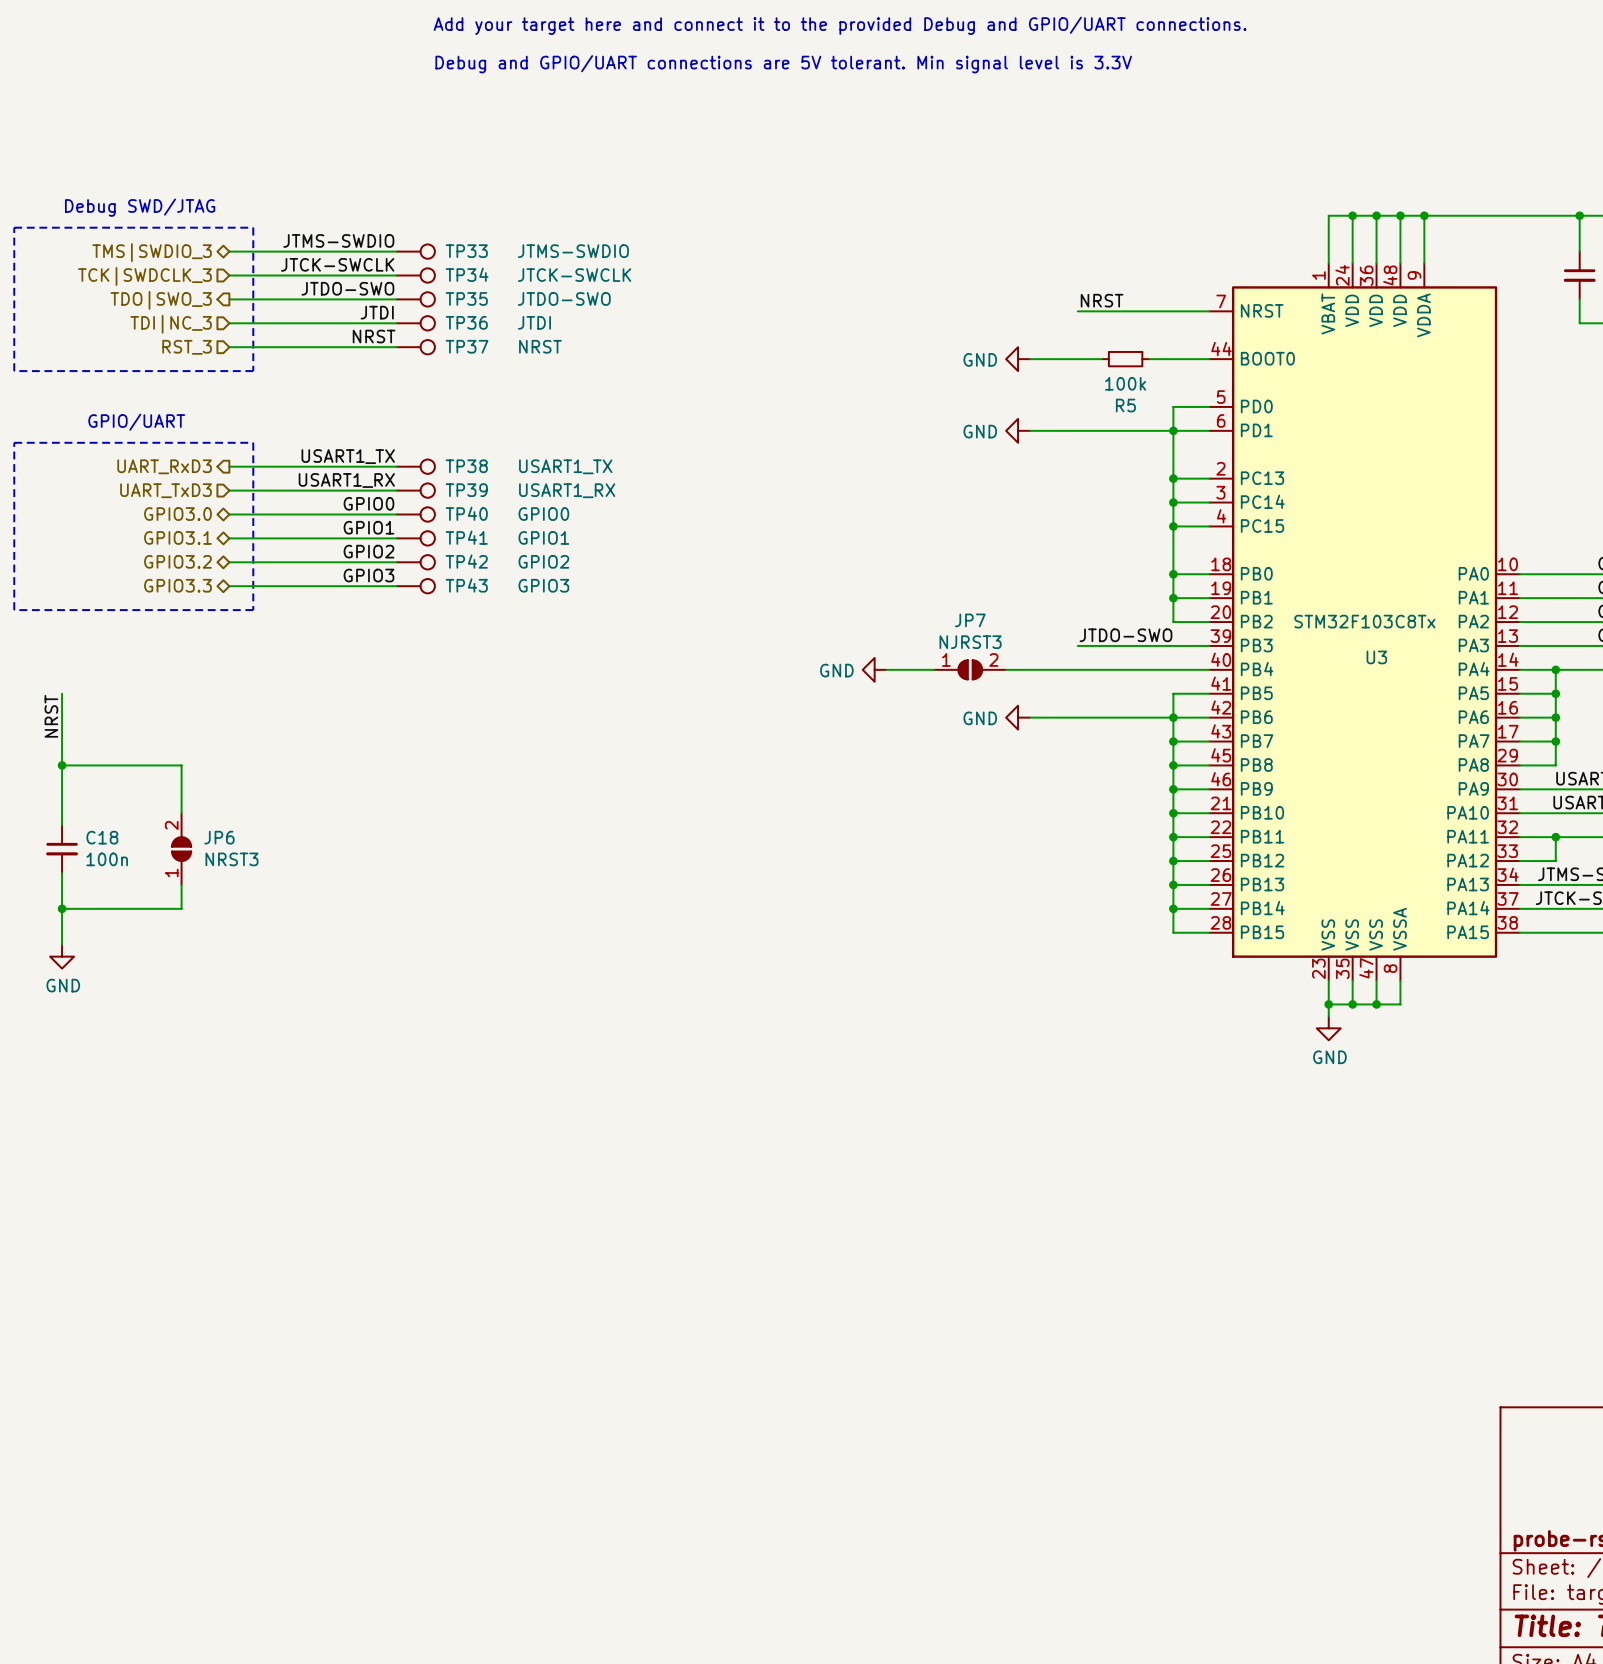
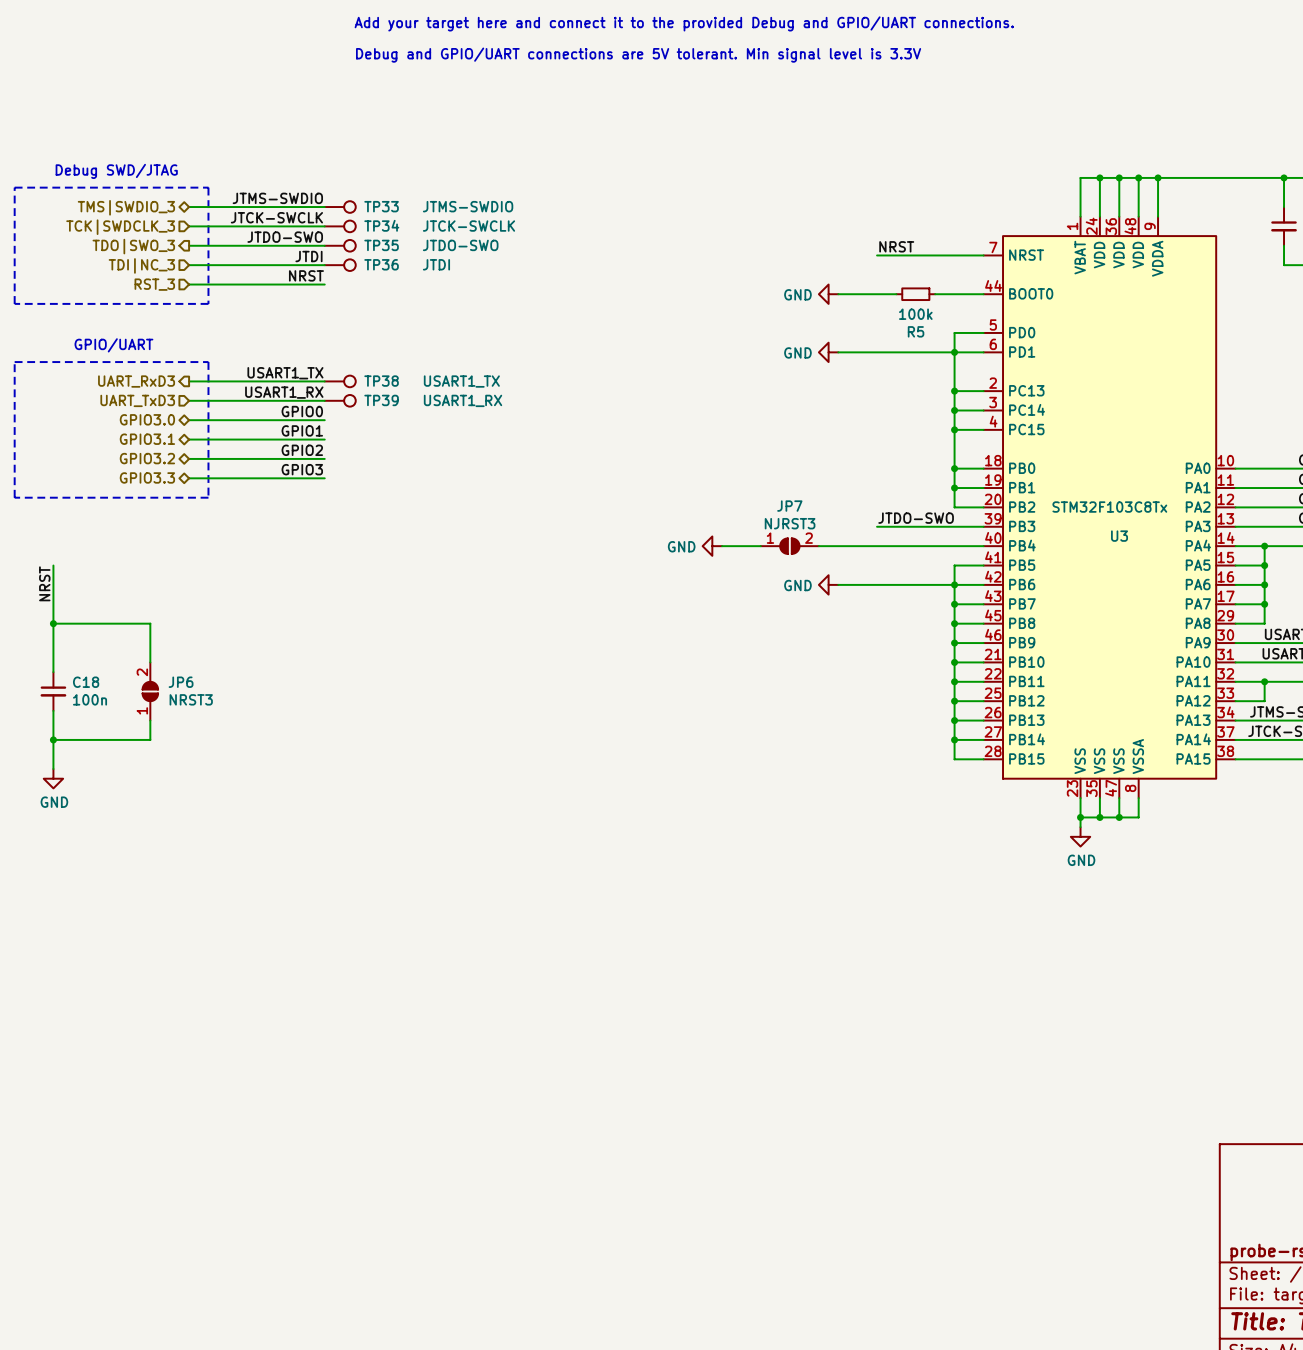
TP37: NRST (415, 347) -> none
TP40: GPIO0 (415, 514) -> none
TP41: GPIO1 (415, 538) -> none
TP42: GPIO2 (415, 562) -> none
TP43: GPIO3 (415, 586) -> none

